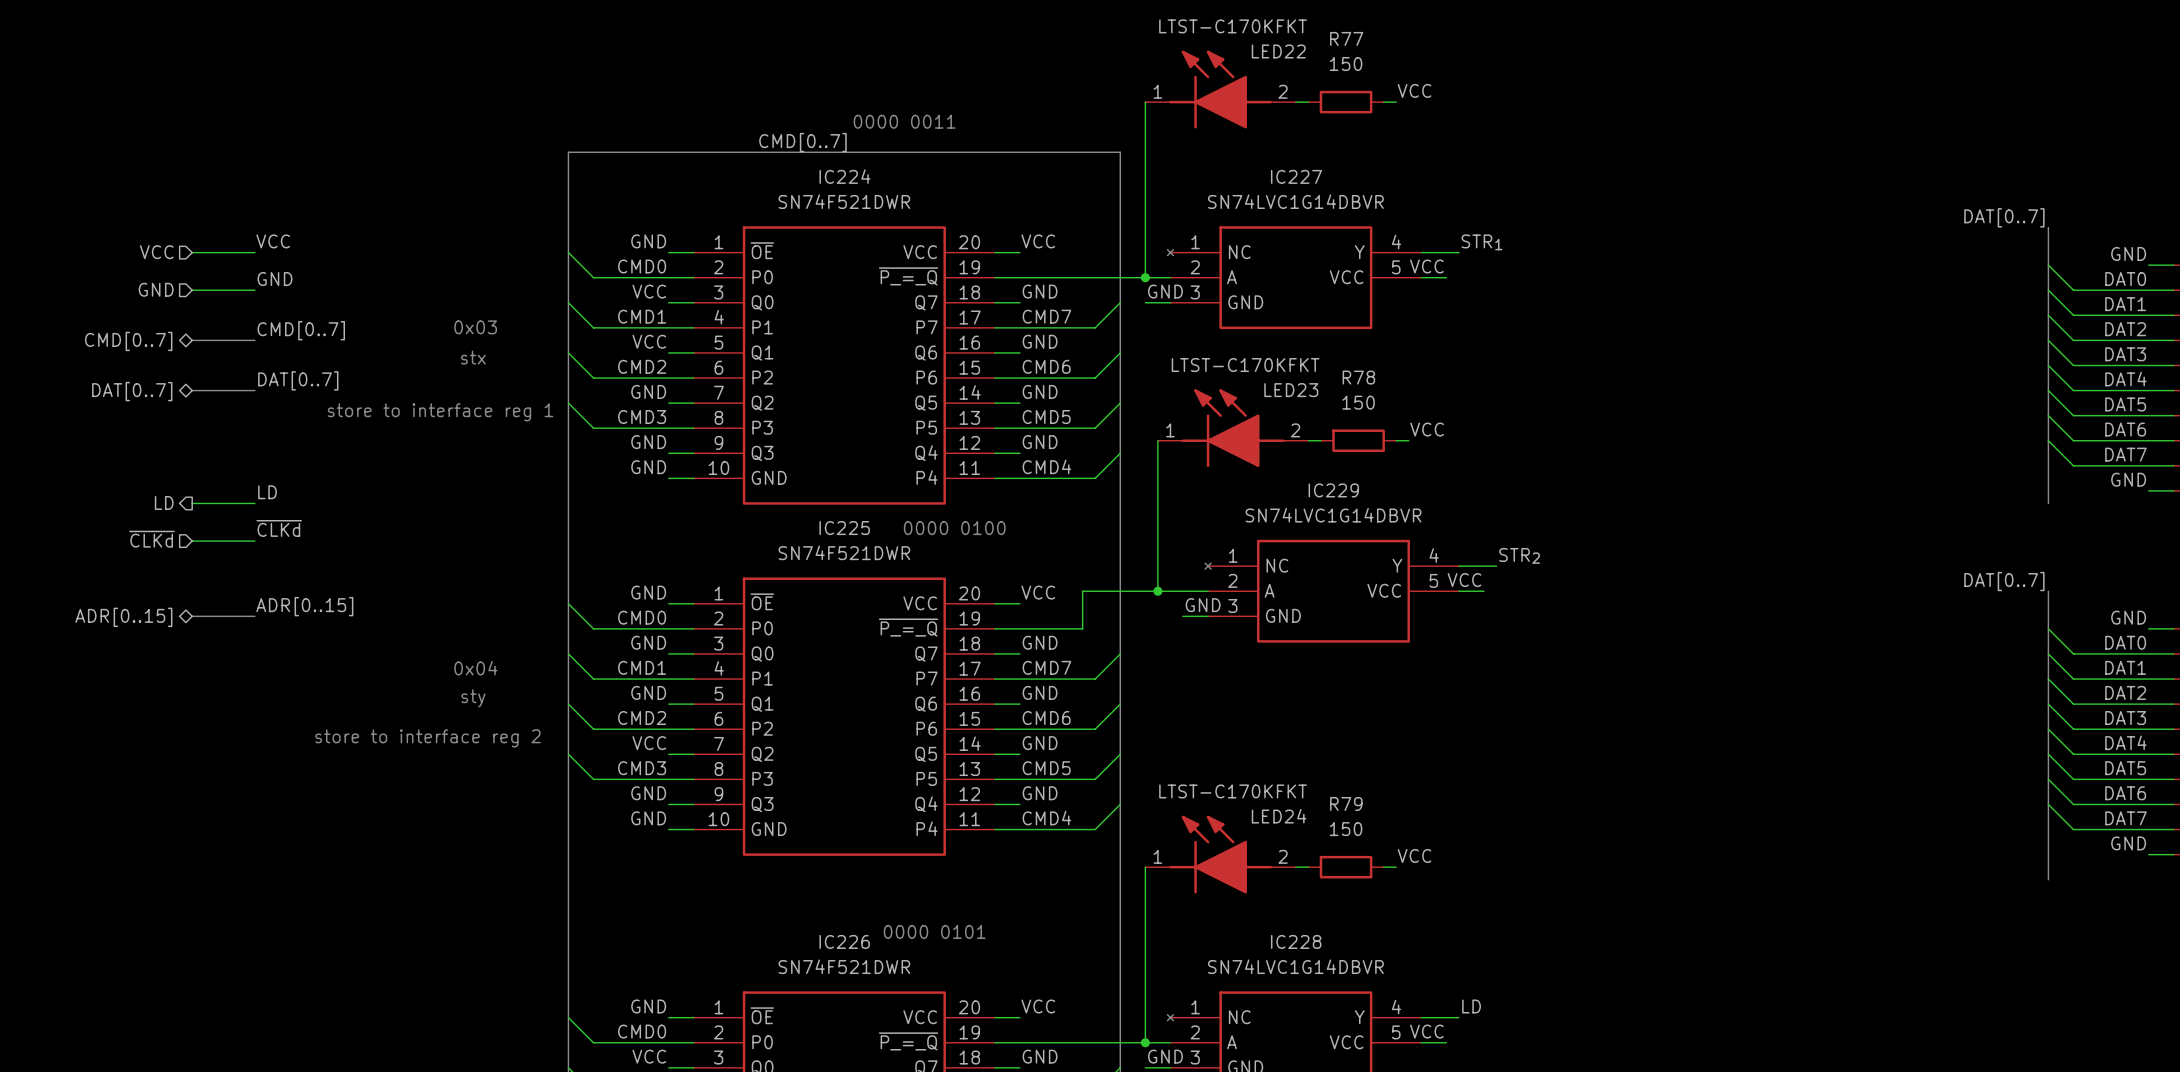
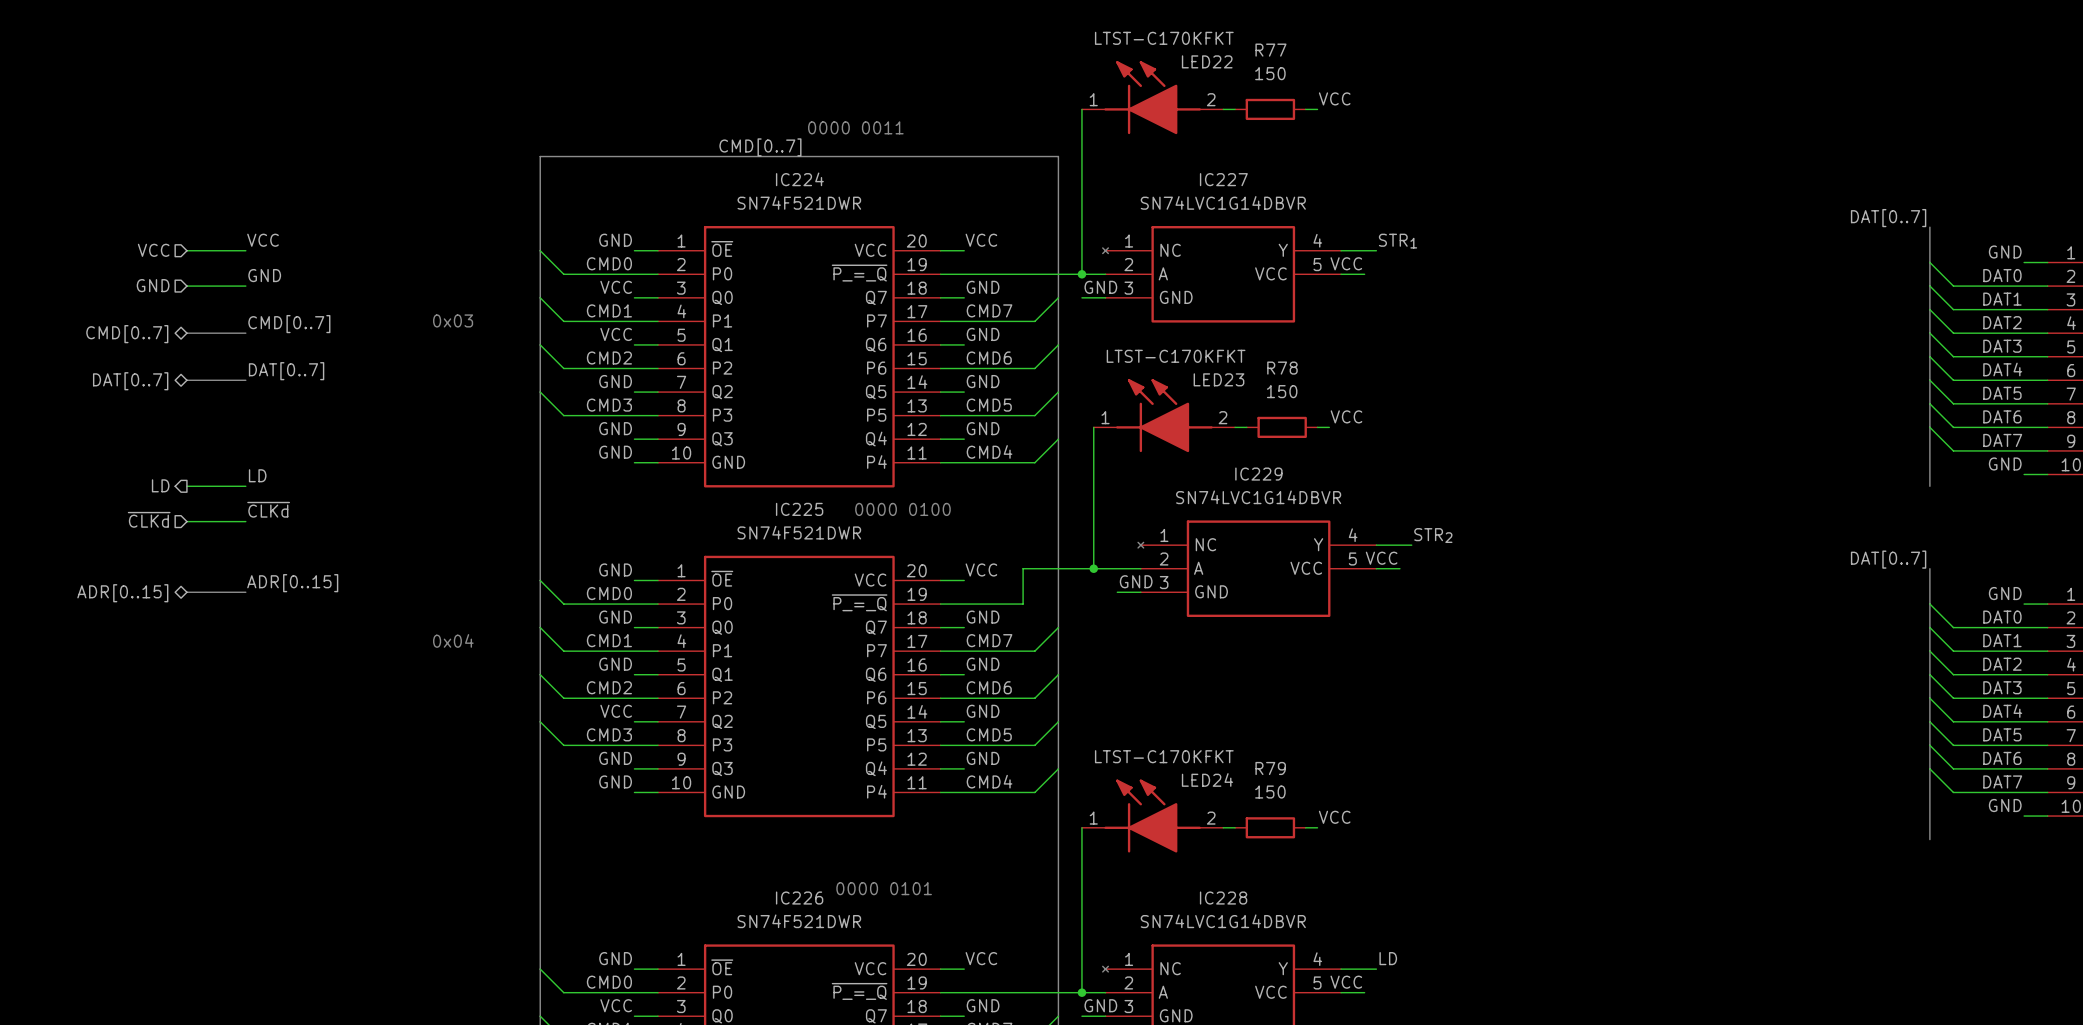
text: stx (473, 357) -> none
text: store to interface reg 1 (440, 412) -> none
text: sty (473, 698) -> none
text: store to interface reg 2 (427, 738) -> none

